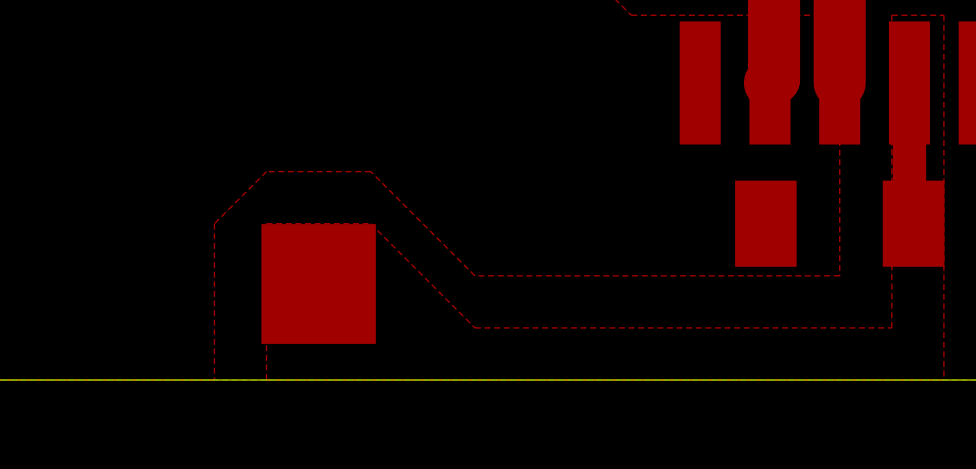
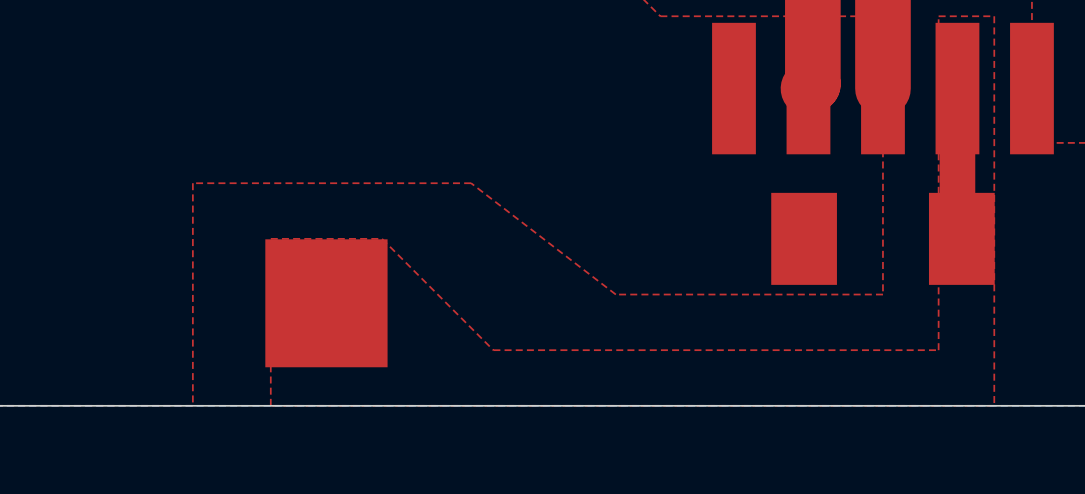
top zone outline: (266, 171) (214, 223) (214, 380) (193, 380) -> (270, 183) (192, 183) (192, 405)
top zone outline: (370, 171) (474, 275) (589, 275) -> (382, 183) (471, 183) (615, 294)

